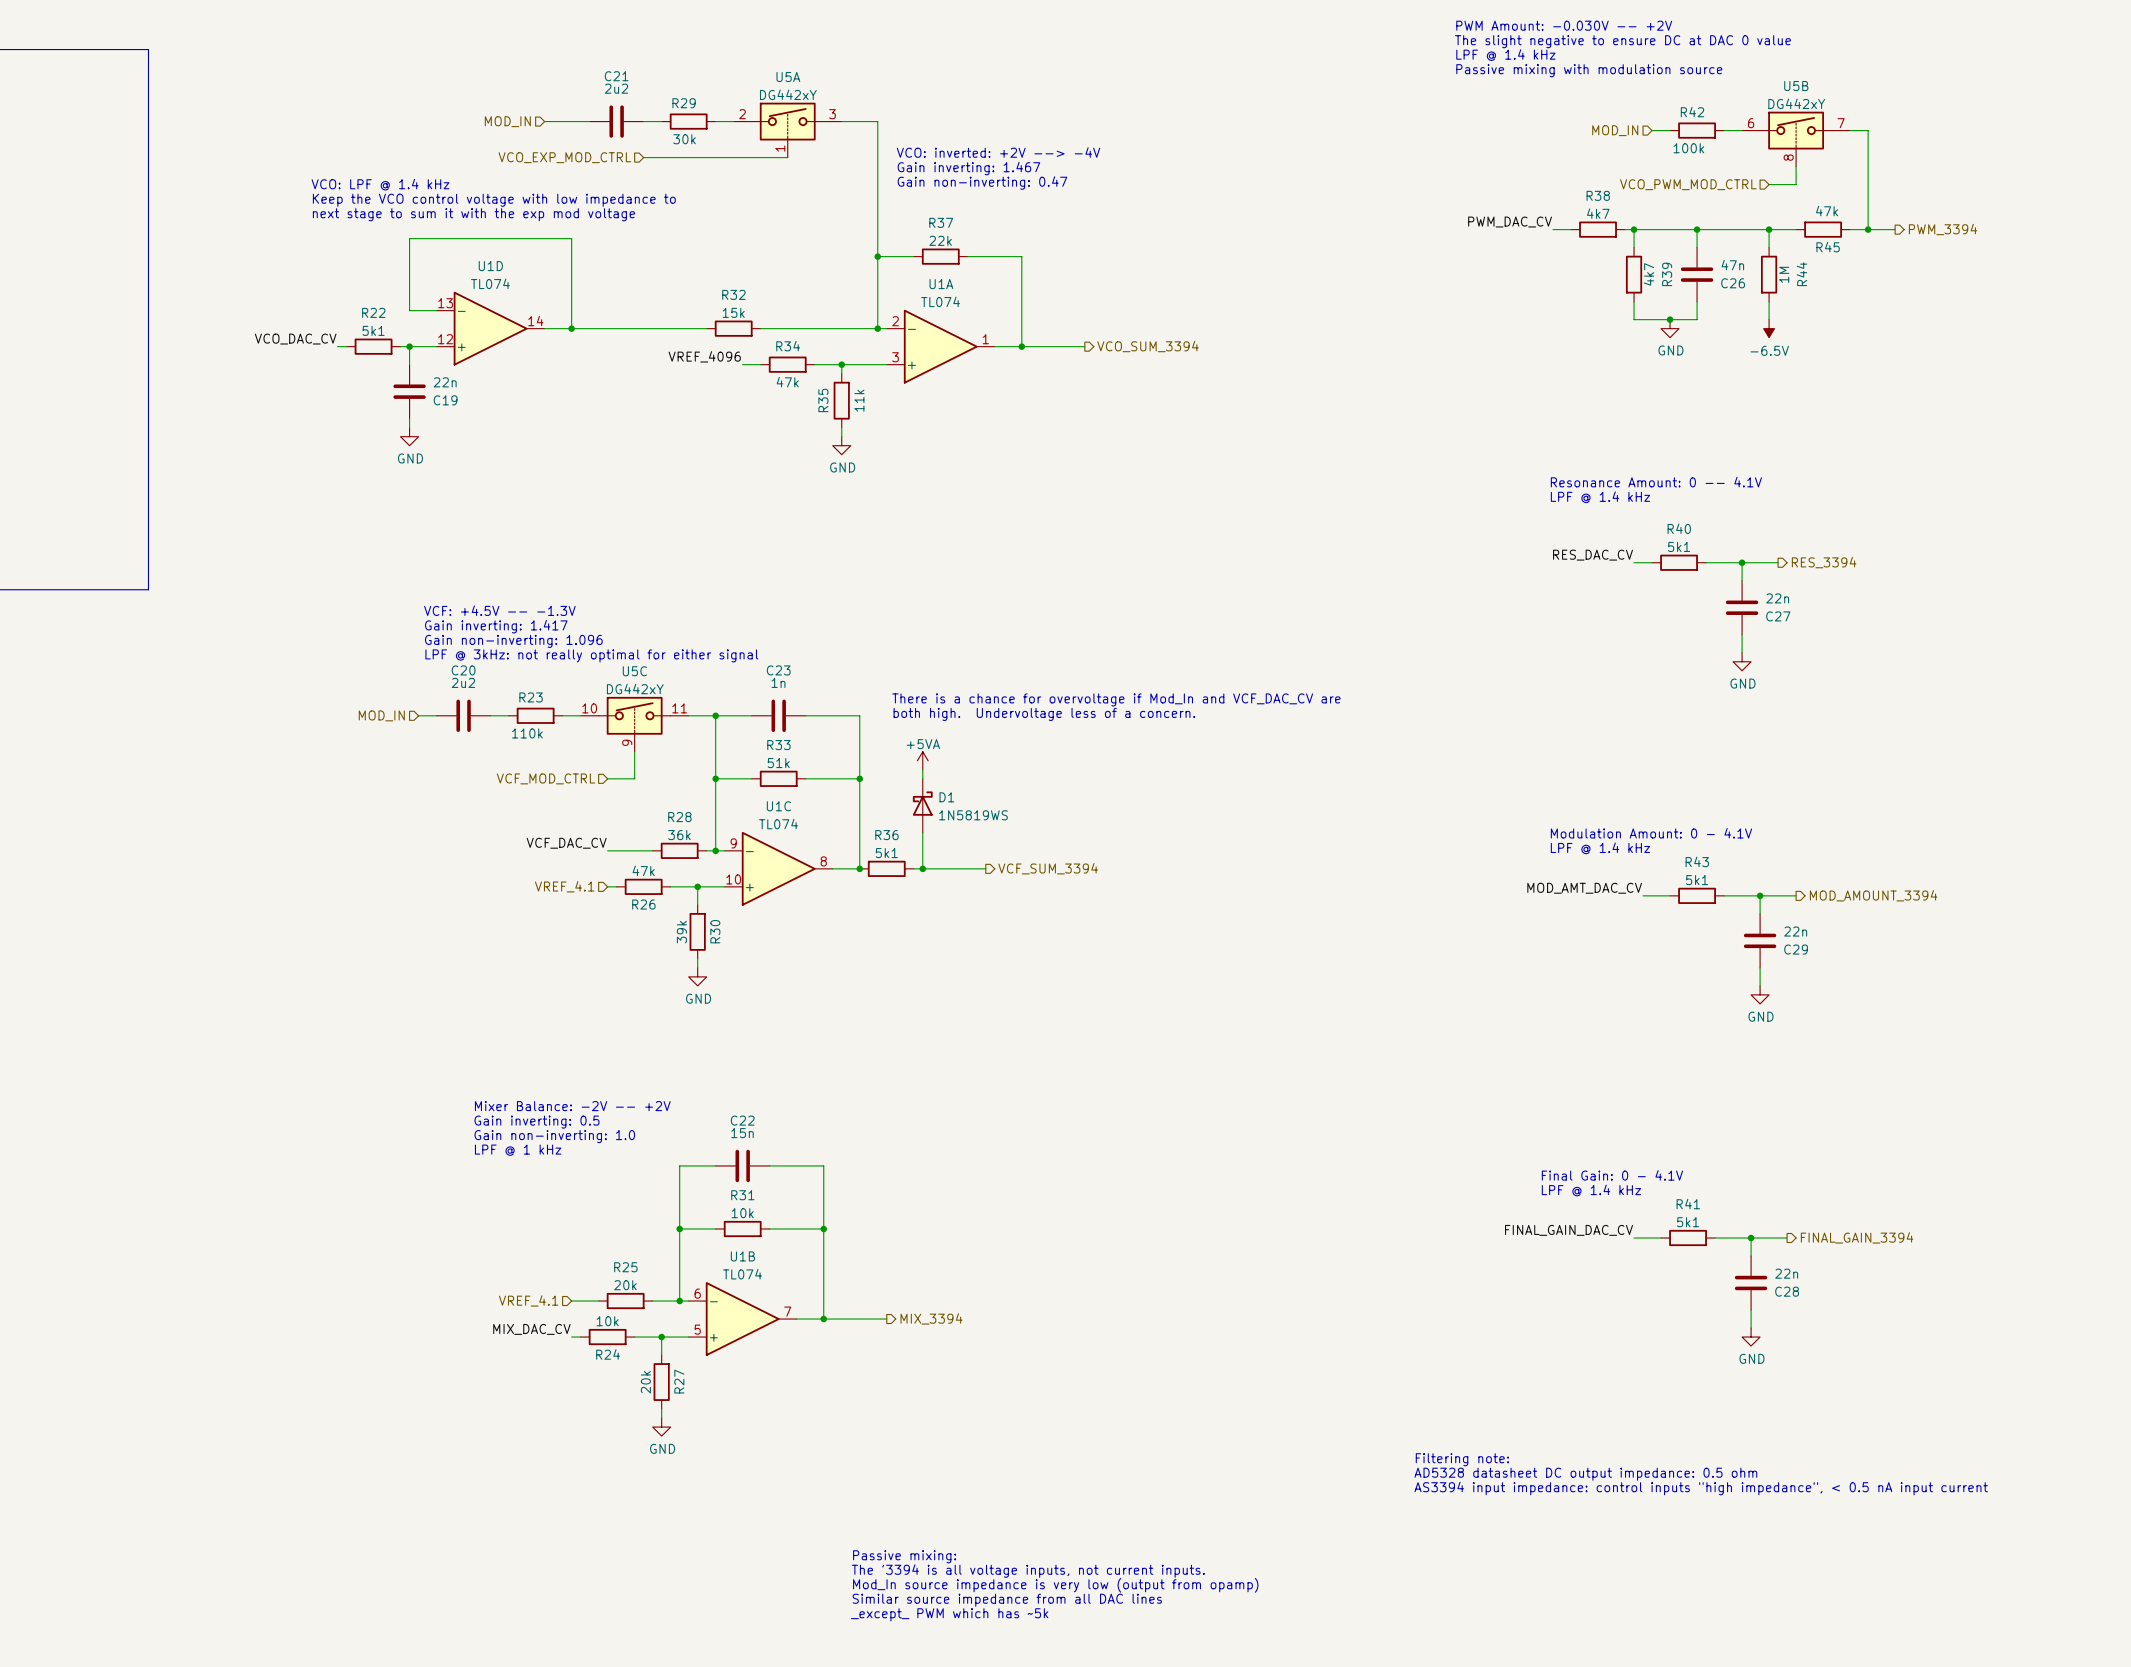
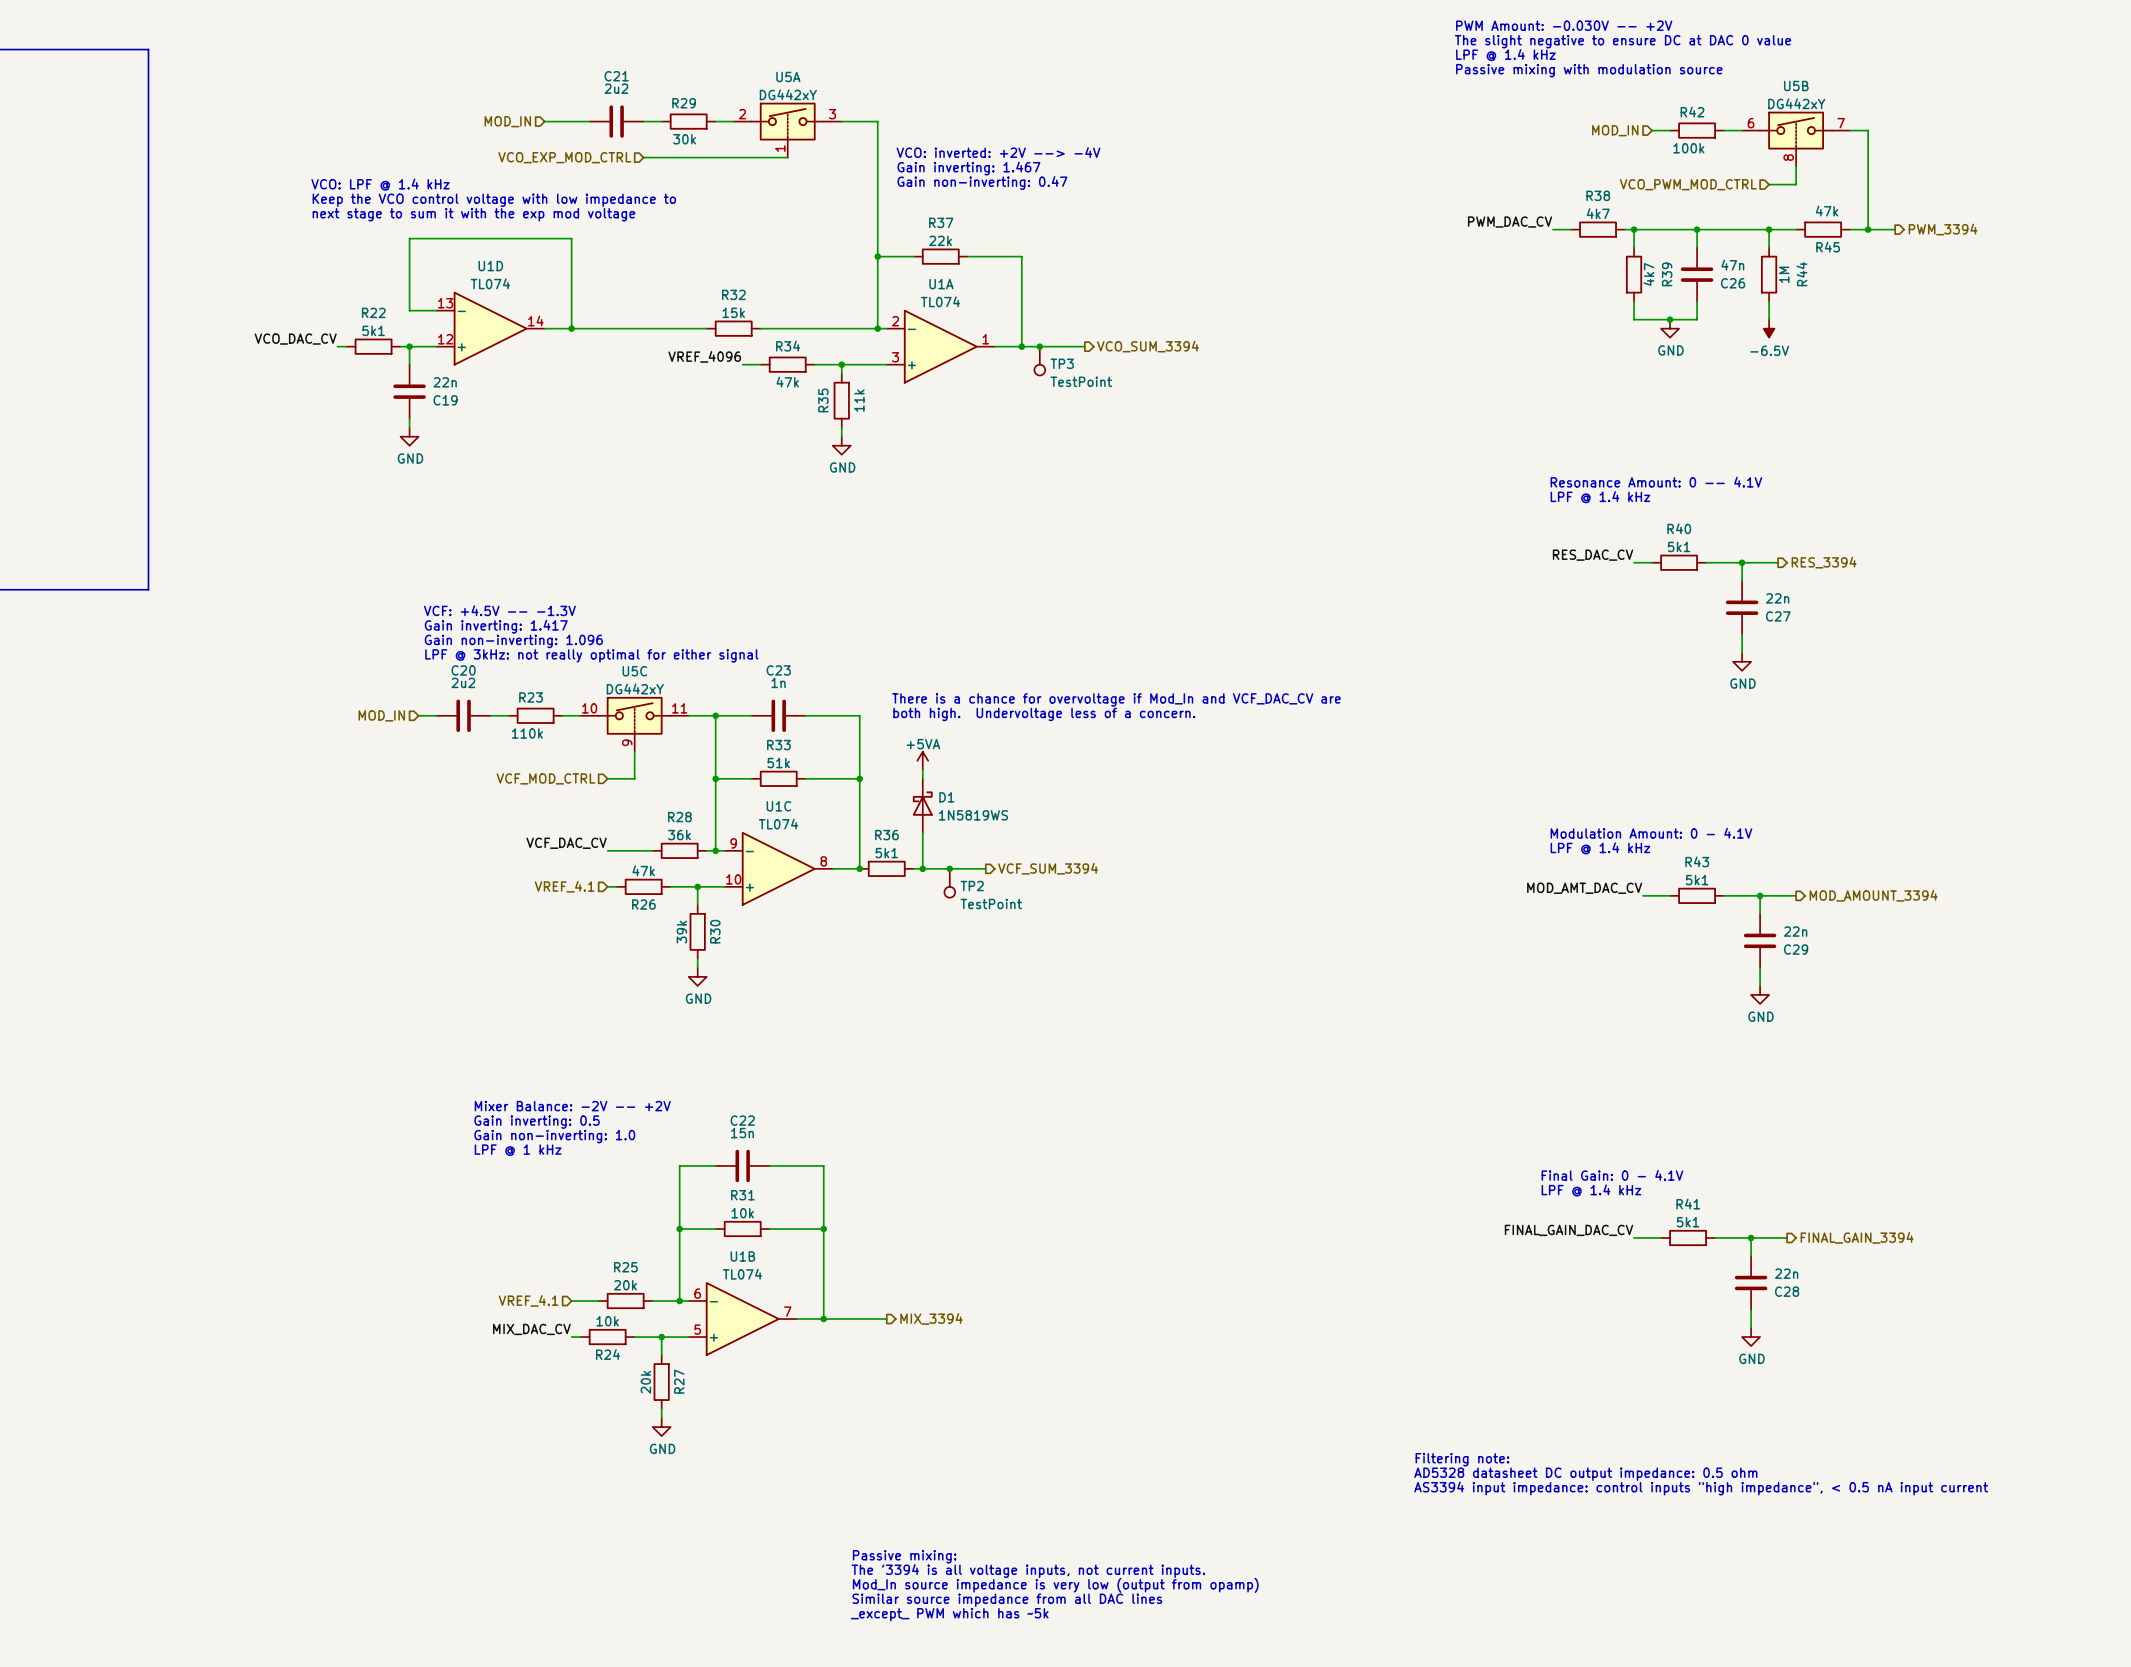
junction: none -> (1039, 346)
TP3: none -> TestPoint (1039, 361)
junction: none -> (949, 868)
TP2: none -> TestPoint (949, 883)

